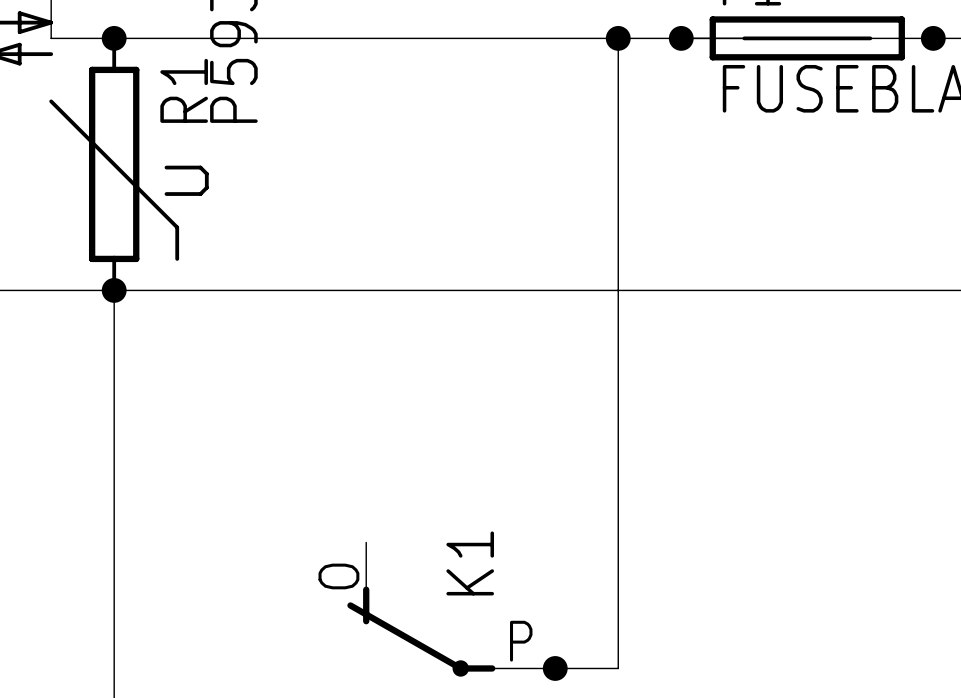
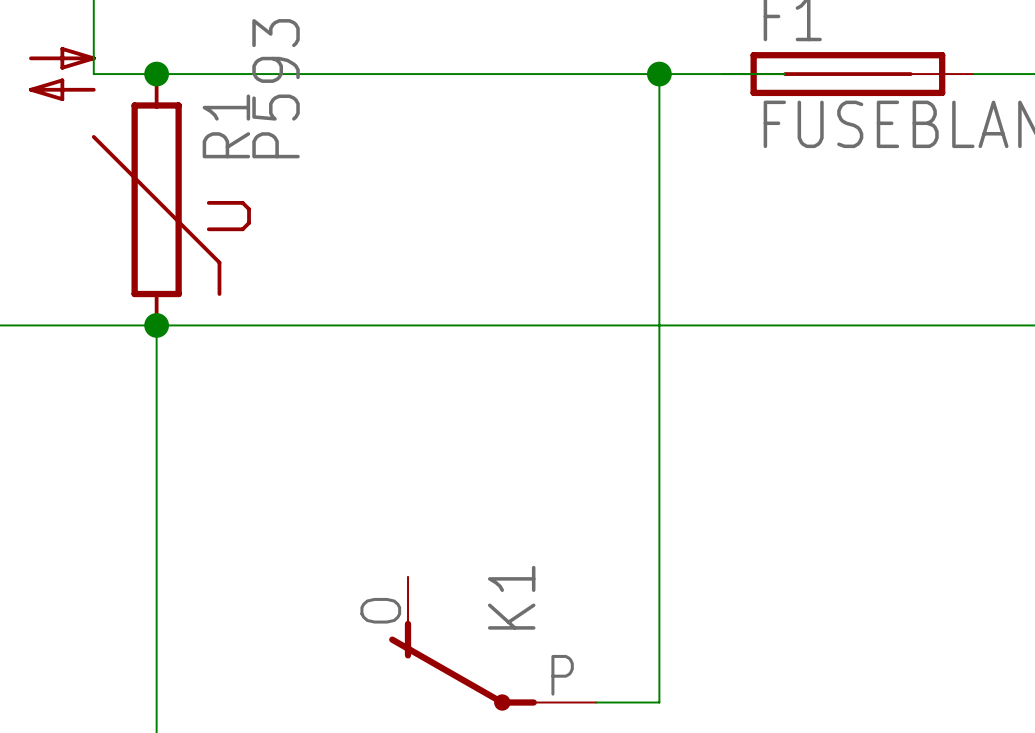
junction: (681, 38) -> none
junction: (933, 38) -> none
junction: (555, 668) -> none

